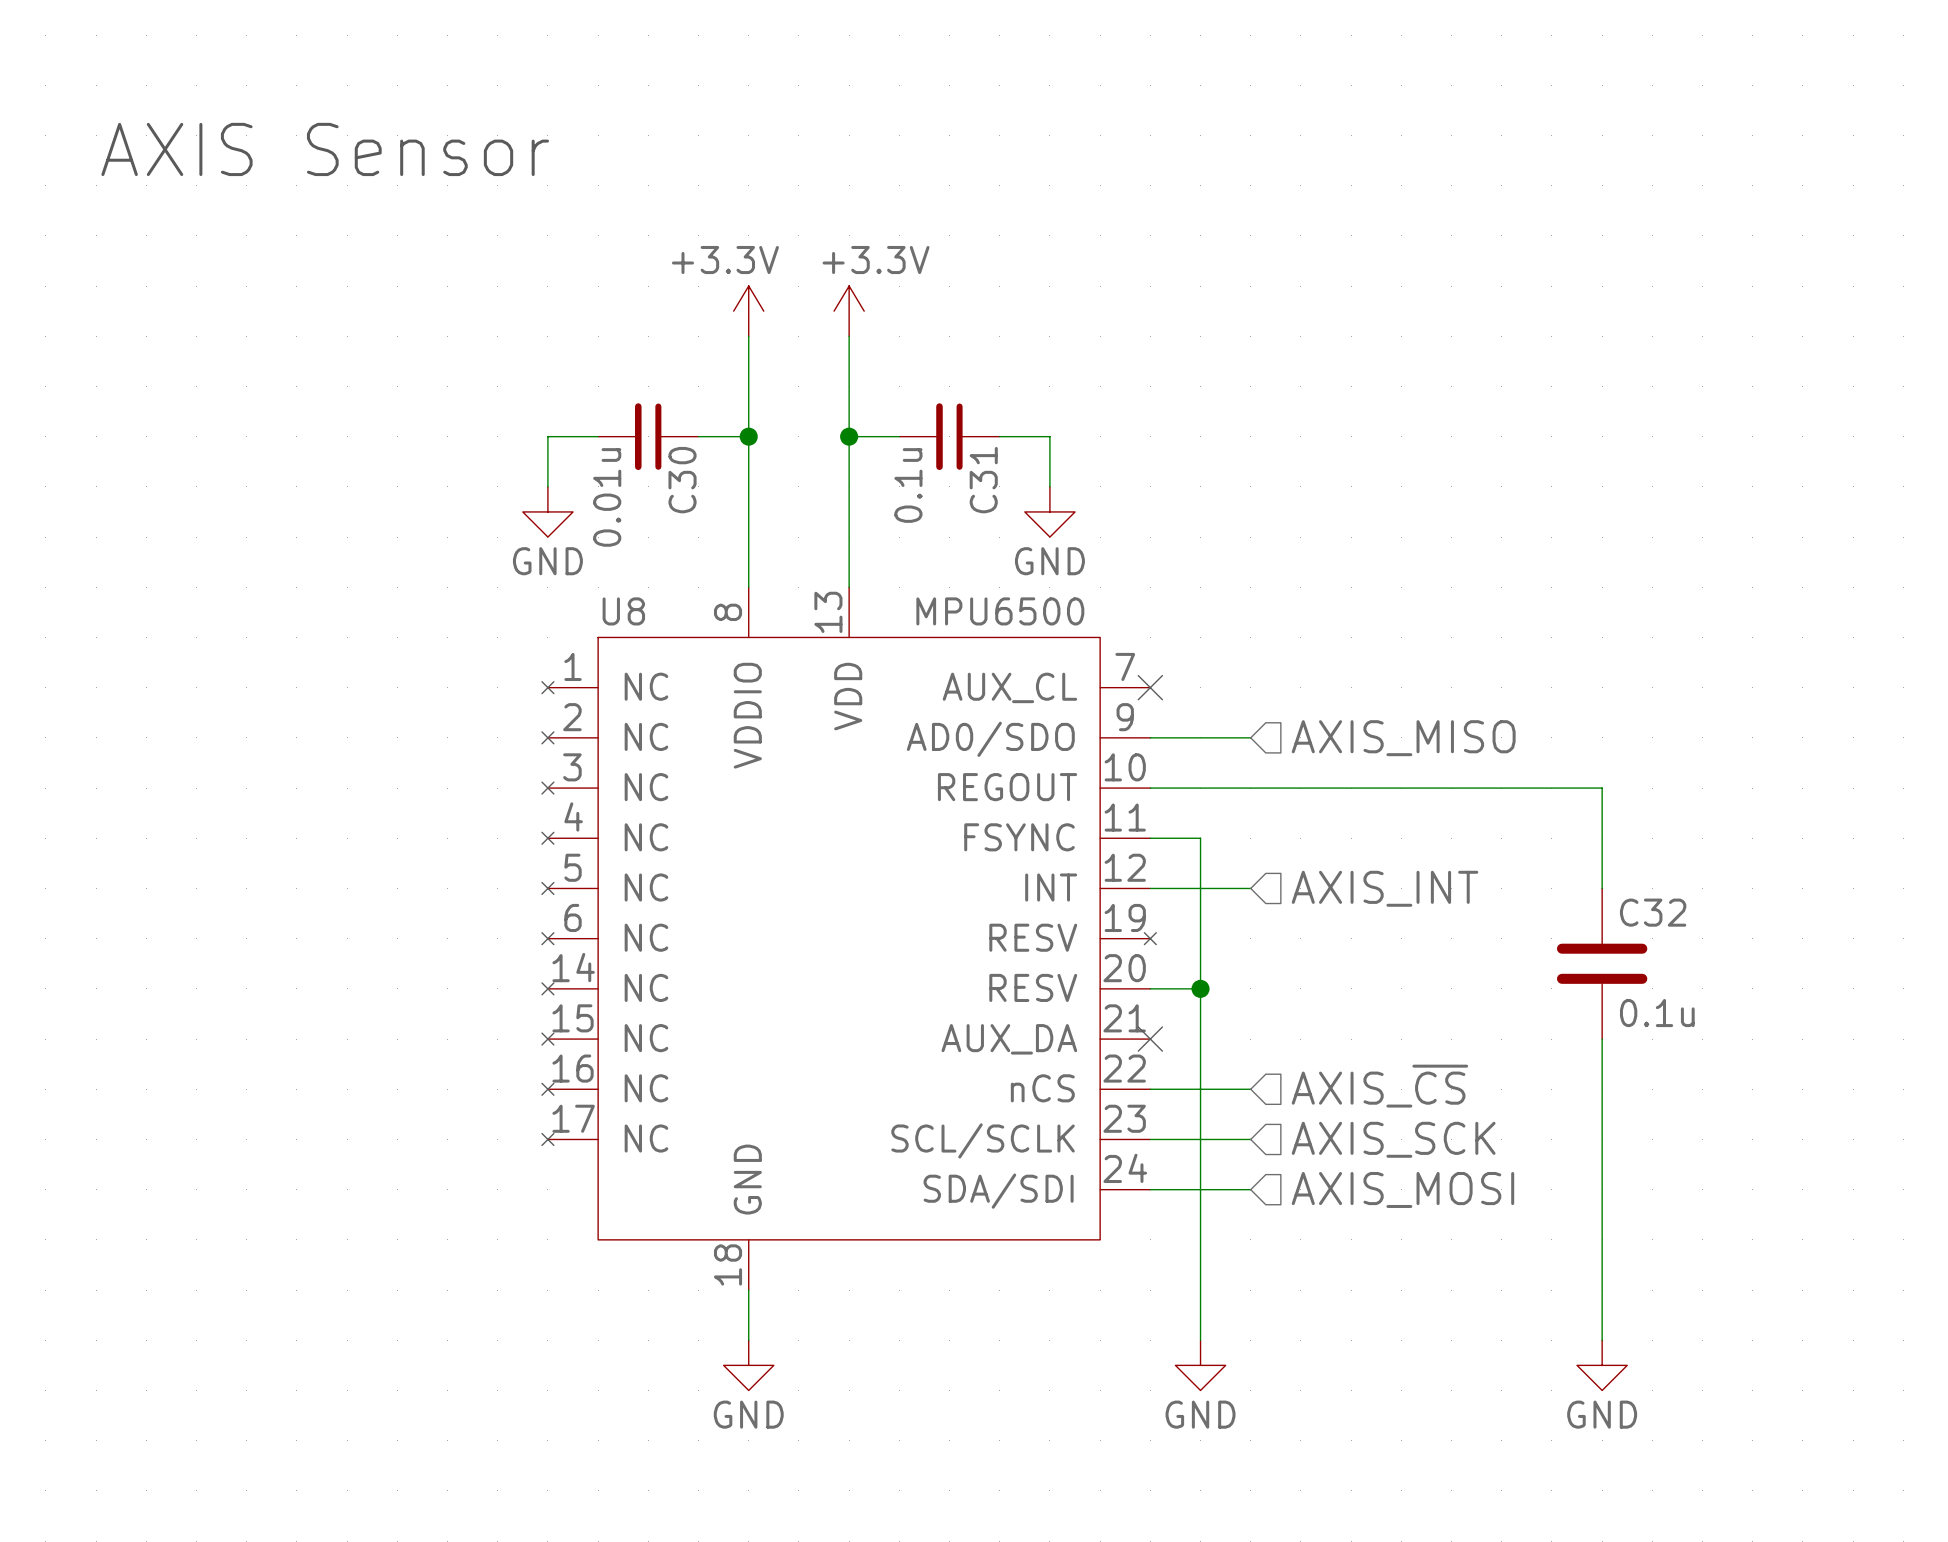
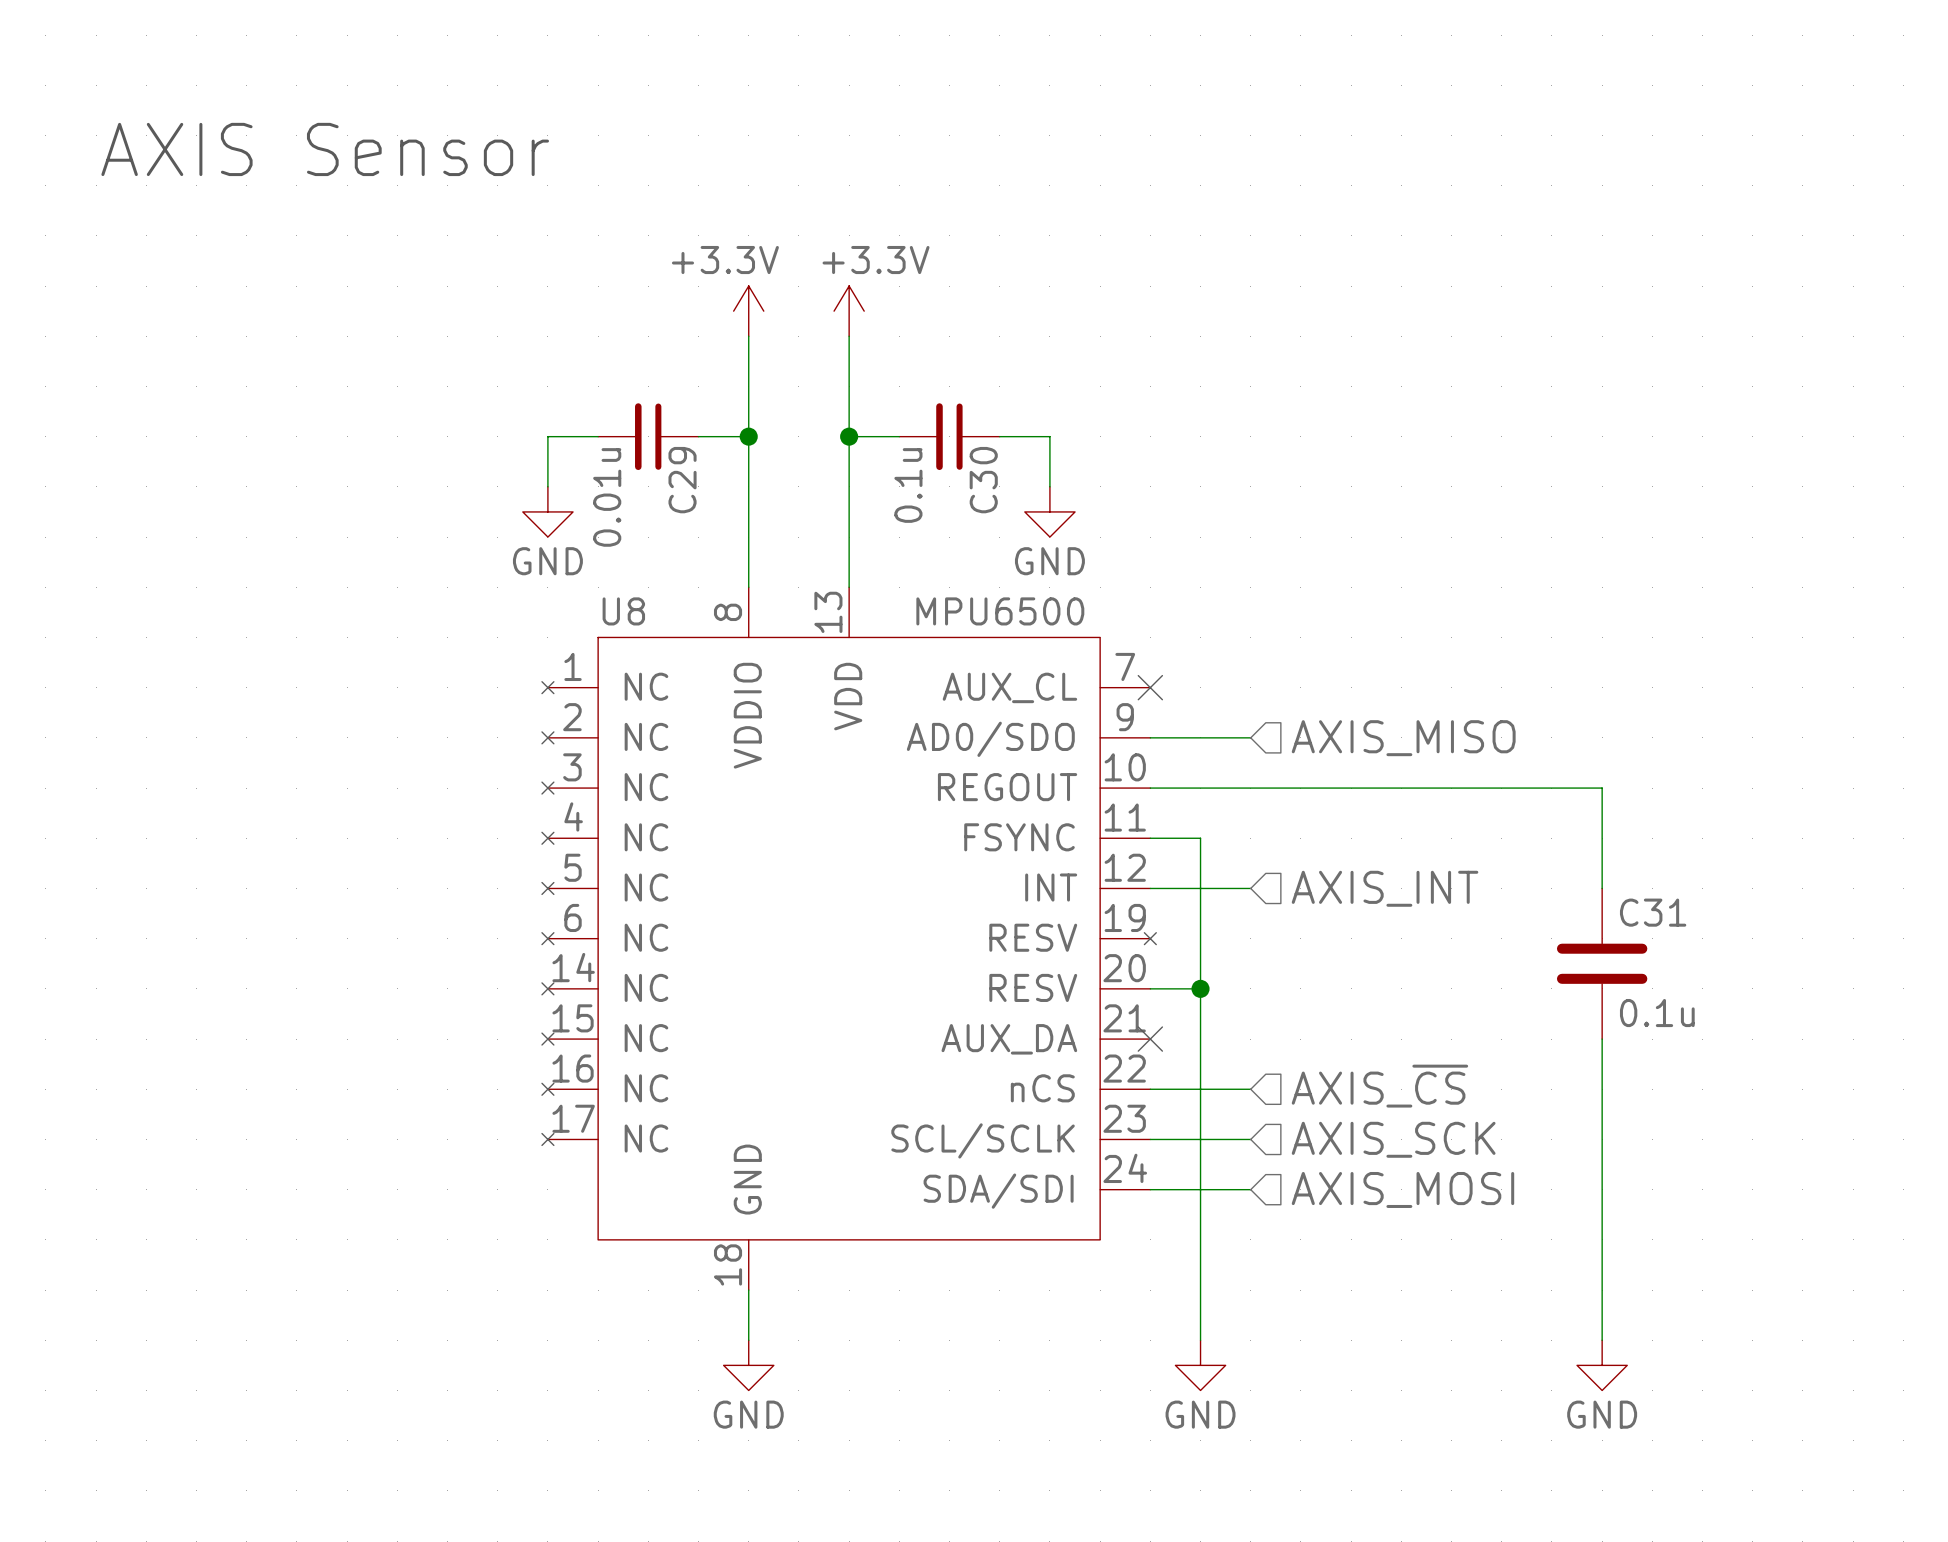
C30 name: C30 (682, 480) -> C29 (682, 480)
C31 name: C31 (983, 480) -> C30 (983, 480)
C32 name: C32 (1653, 912) -> C31 (1653, 912)

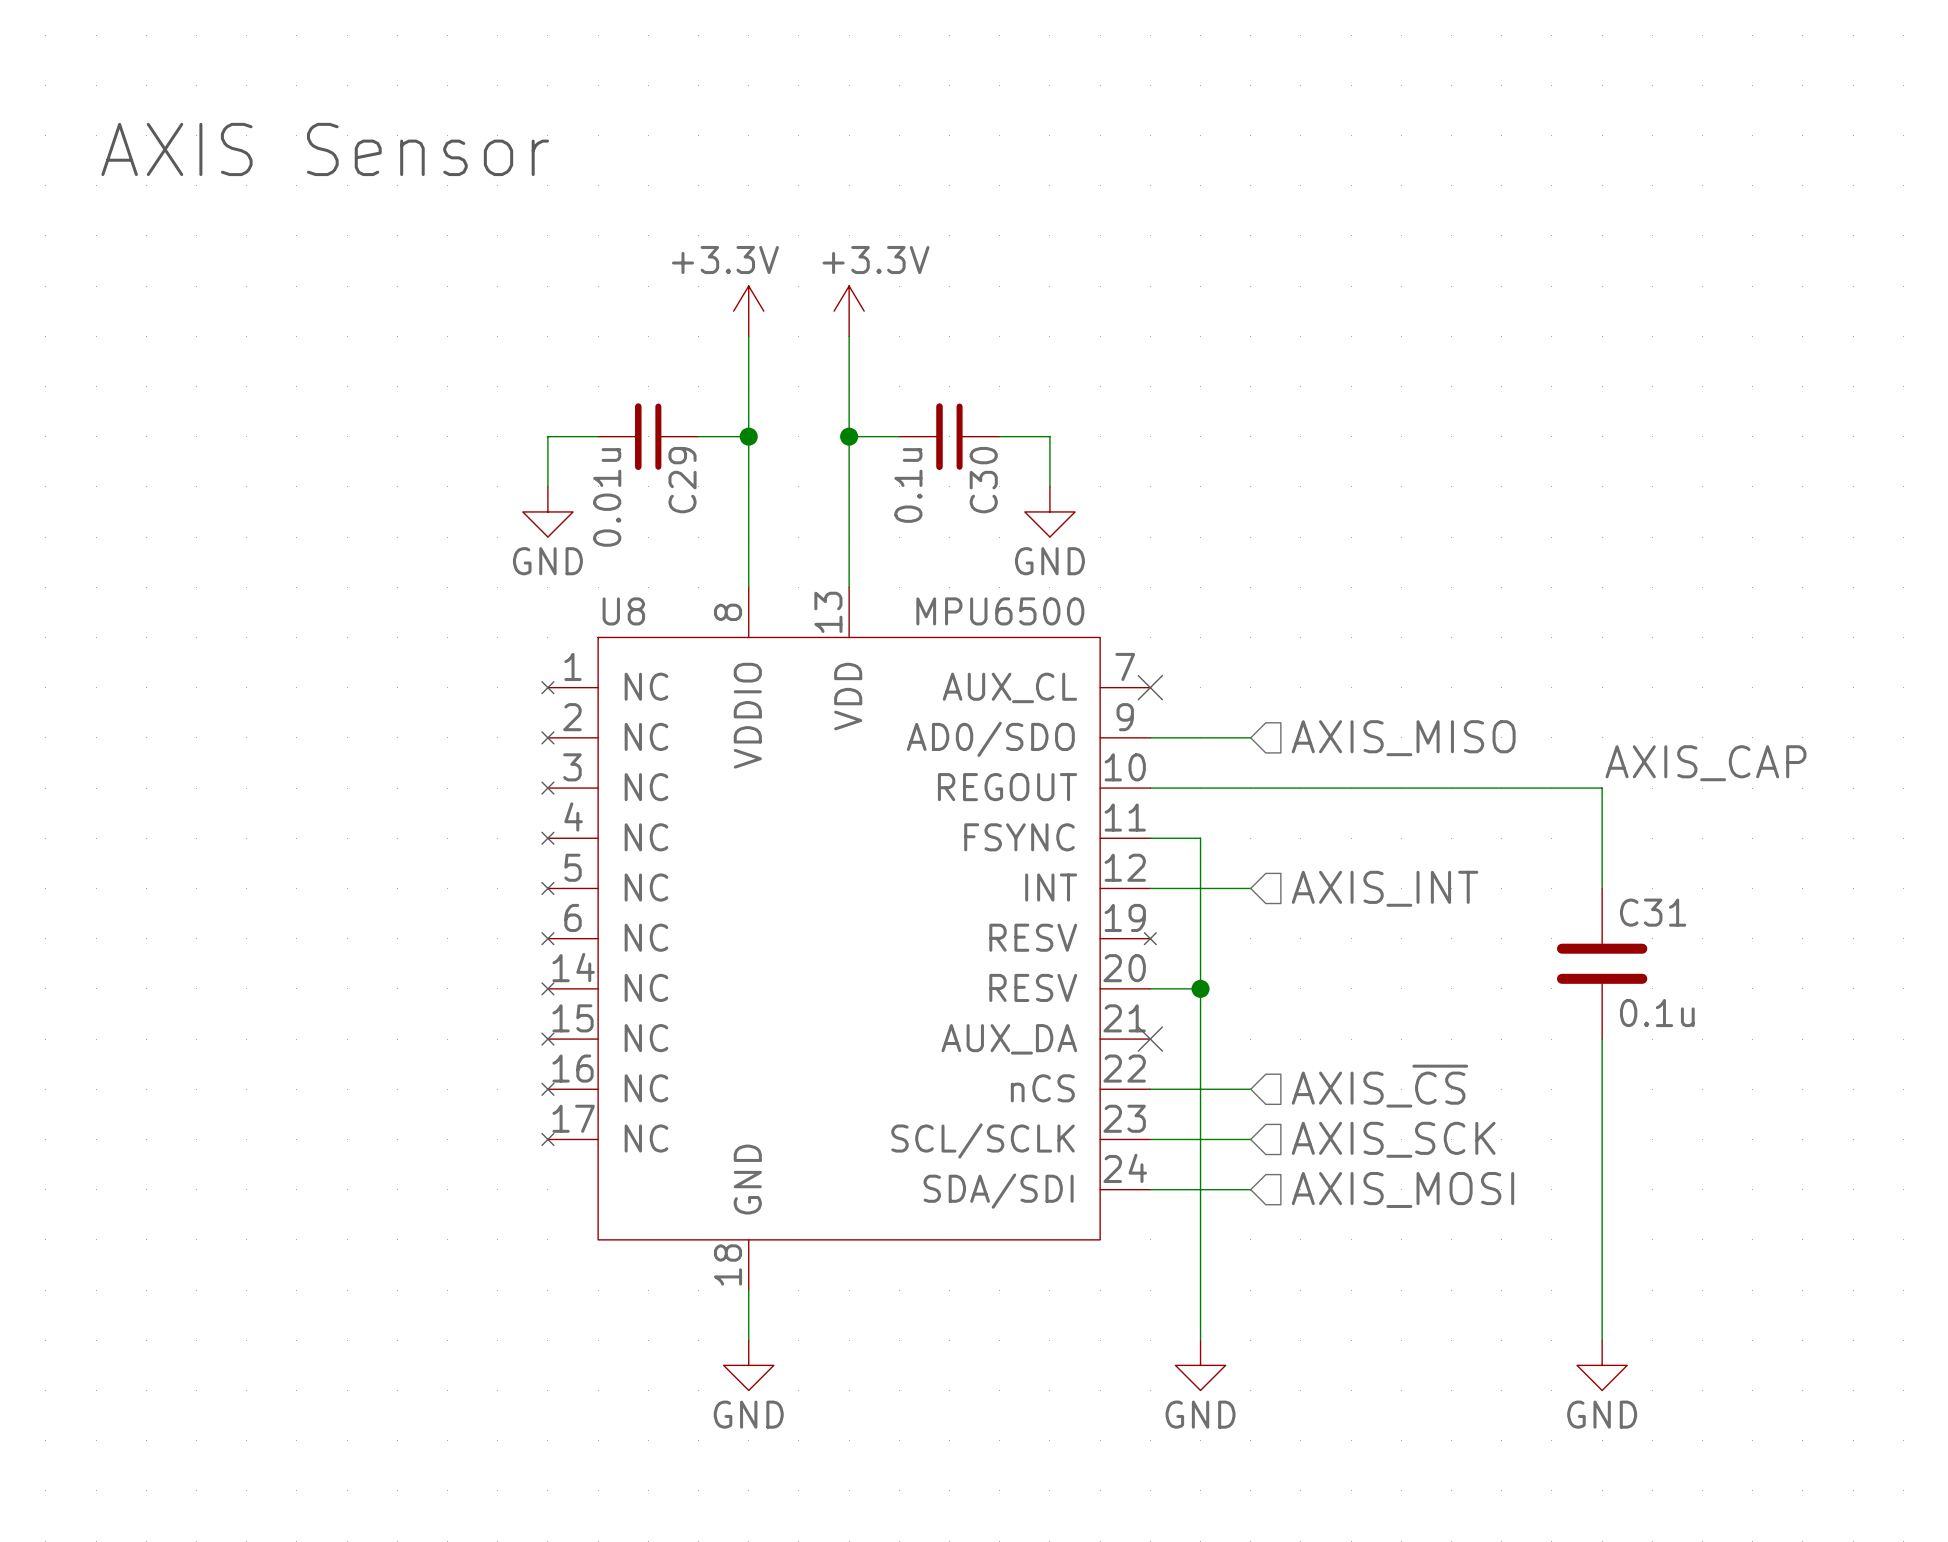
label: none -> AXIS_CAP (1705, 763)

